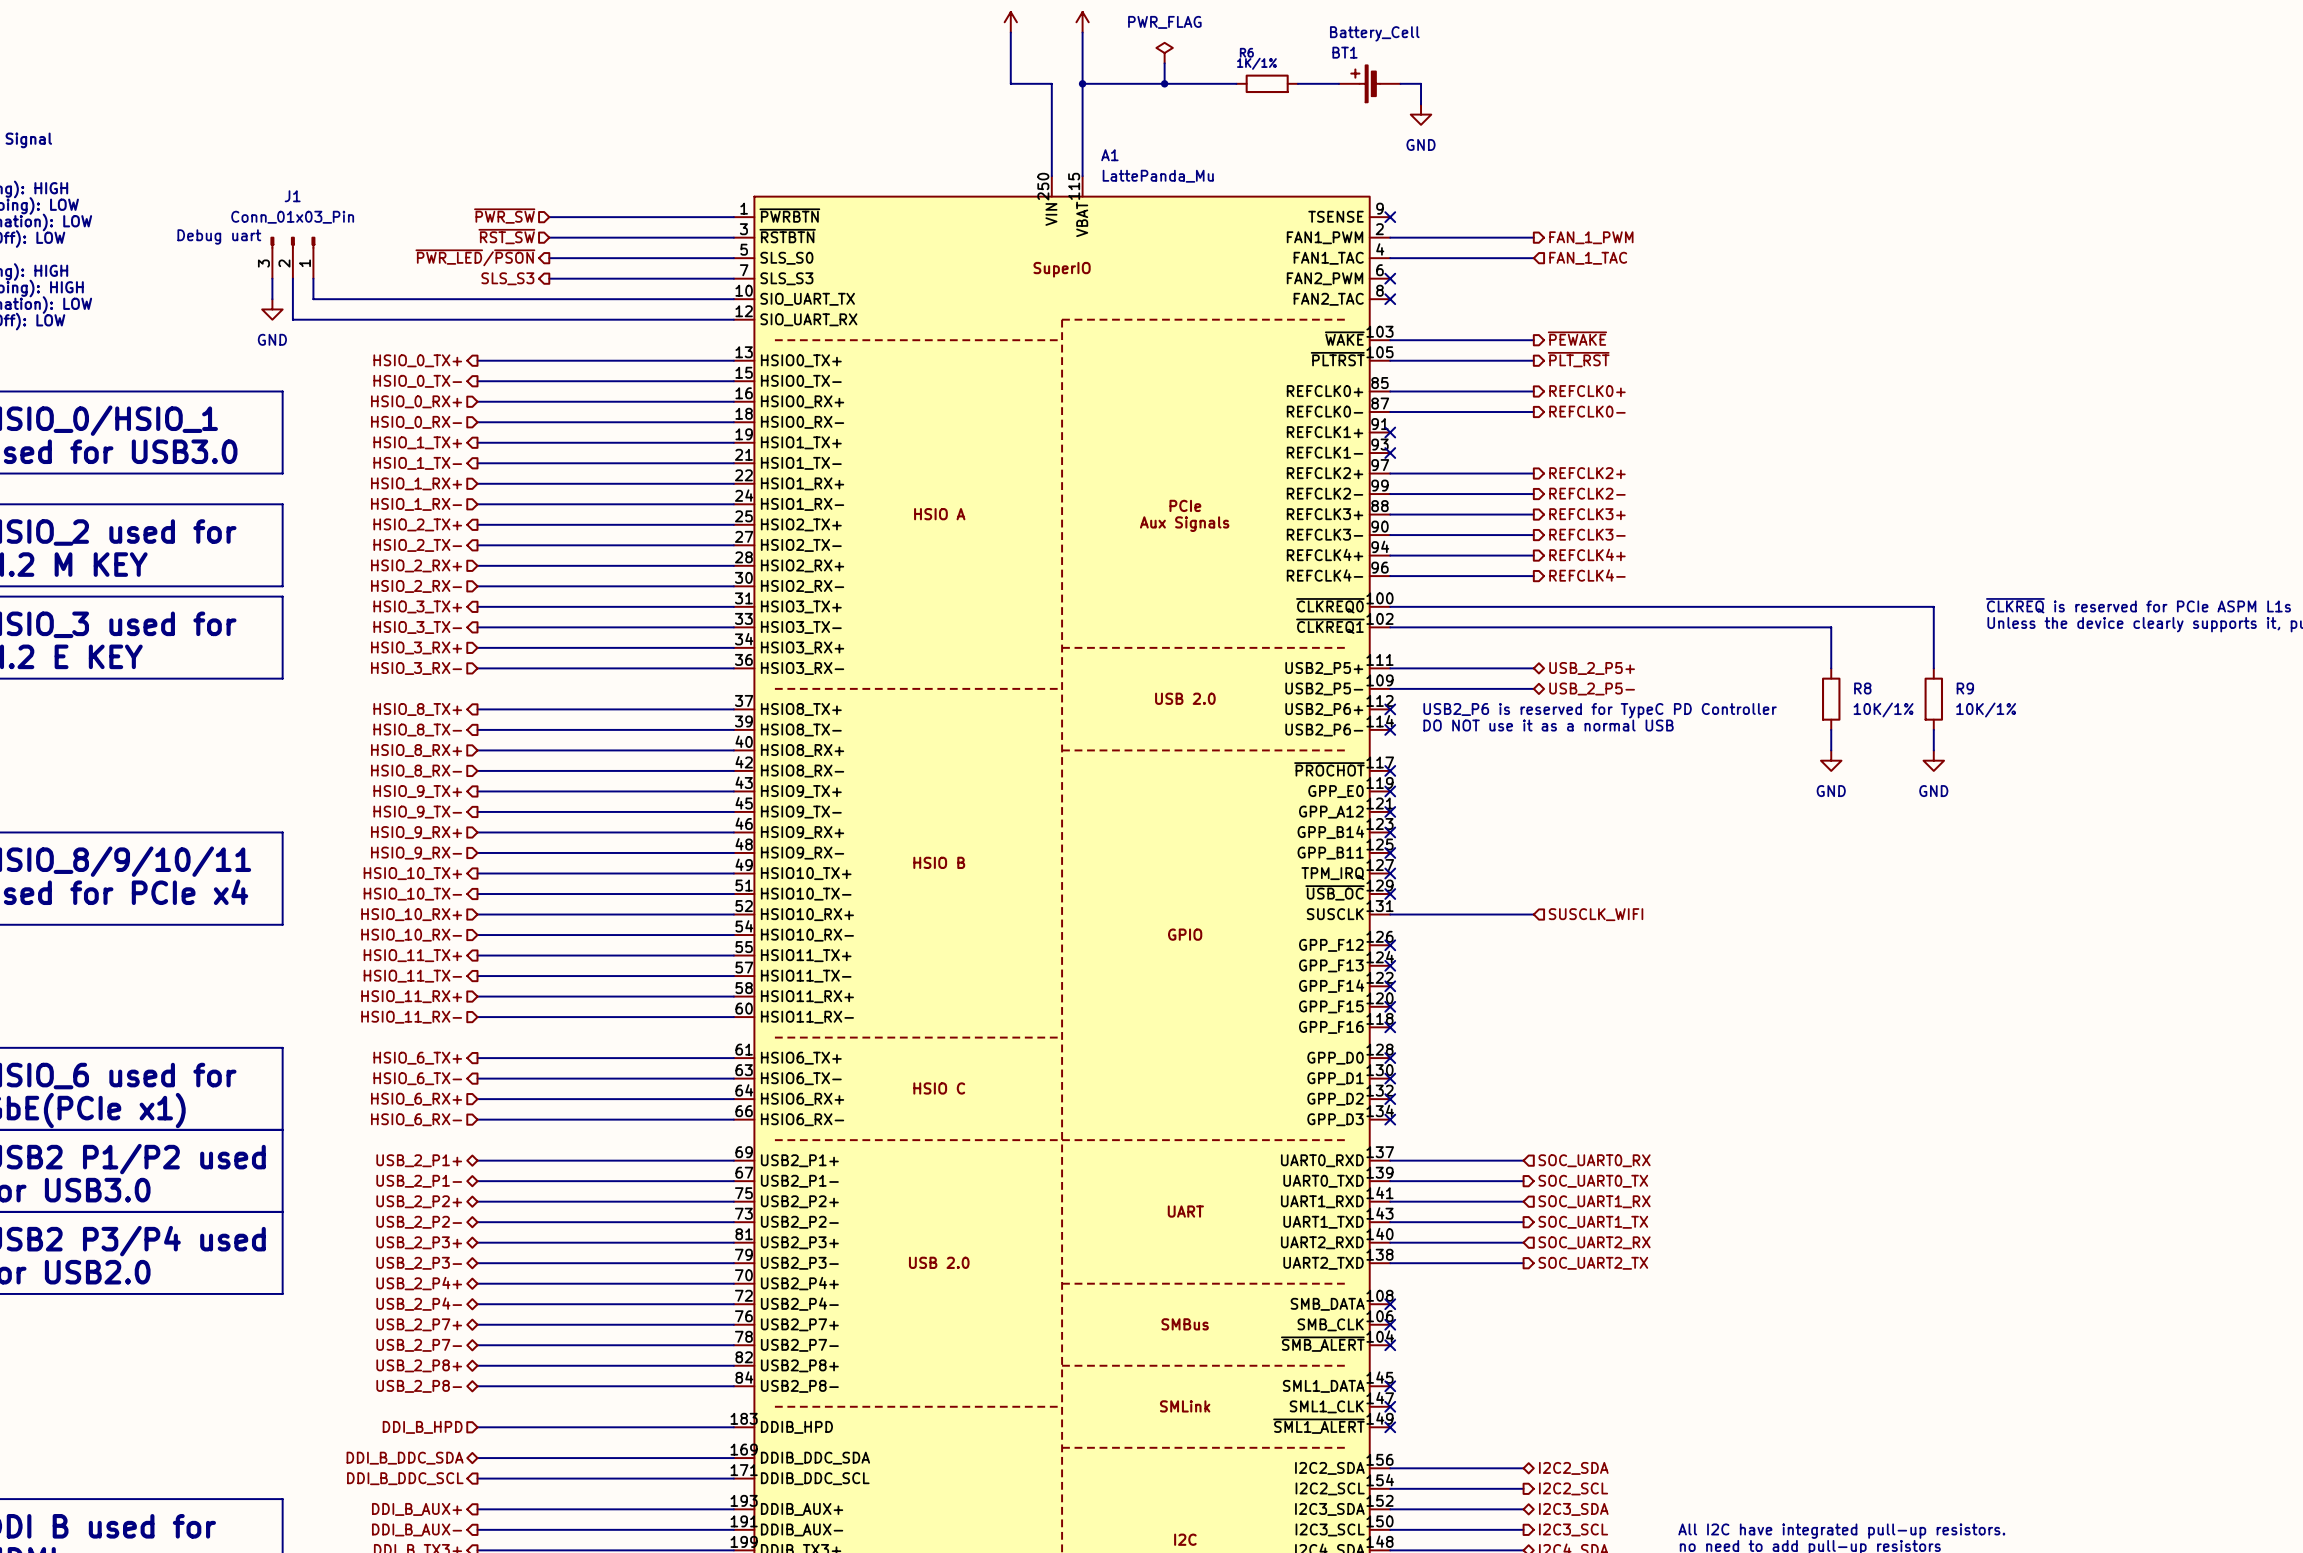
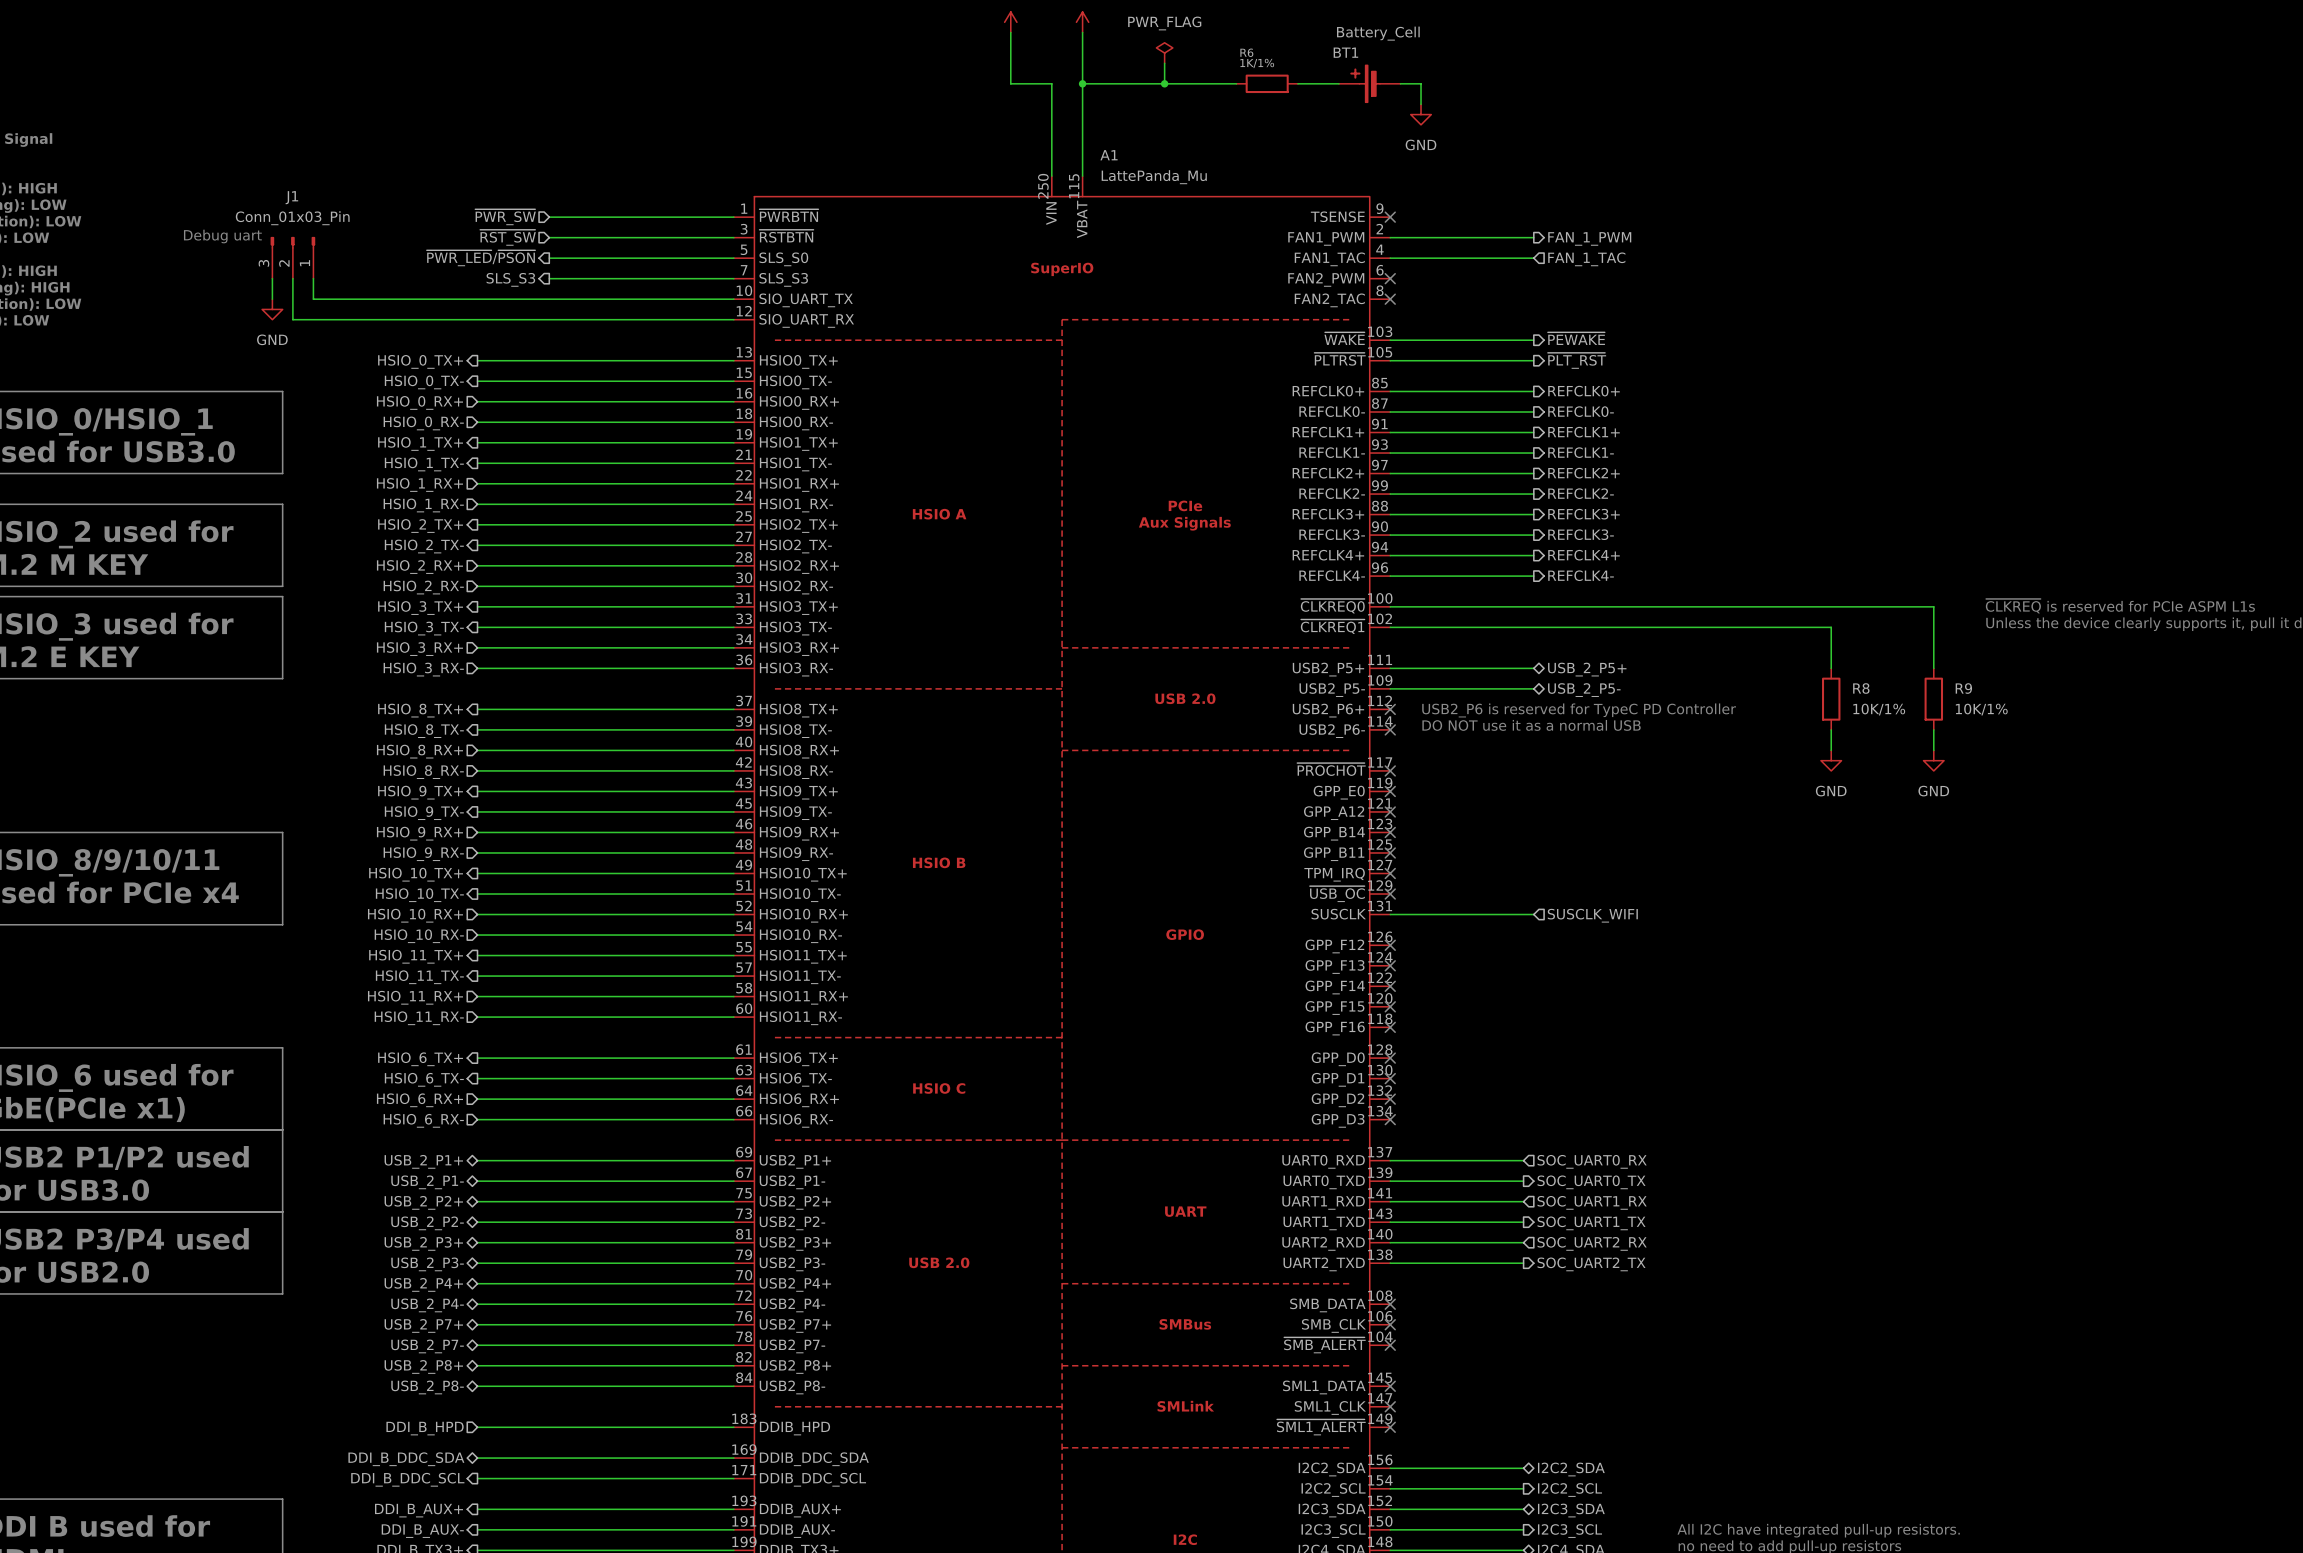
wire: none -> (1390, 432) (1533, 432)
no-connect mark: (1390, 432) -> none
hierarchical label: none -> REFCLK1+ (1583, 432)
hierarchical label: none -> REFCLK1- (1581, 452)
wire: none -> (1390, 453) (1533, 453)
no-connect mark: (1390, 453) -> none

